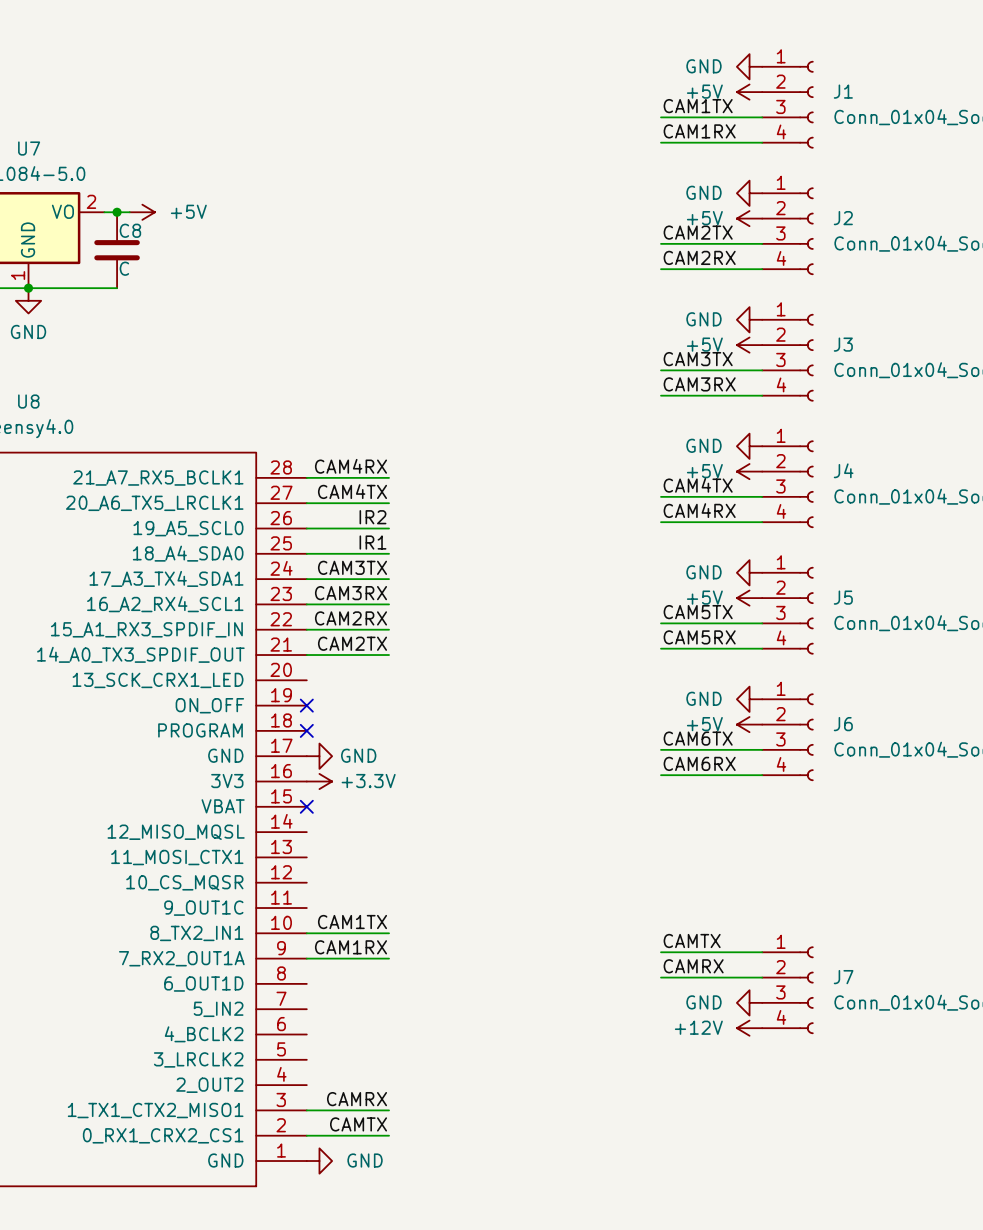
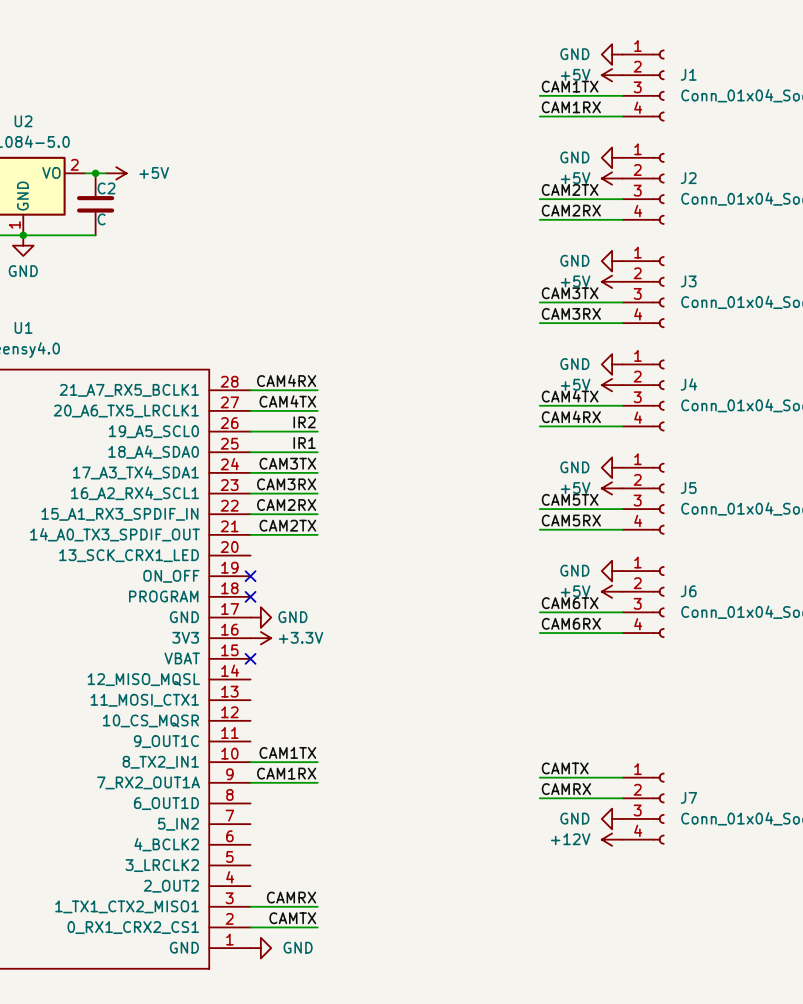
U7 name: U7 (29, 148) -> U2 (23, 121)
C8 name: C8 (130, 230) -> C2 (106, 188)
U8 name: U8 (28, 401) -> U1 (23, 327)

